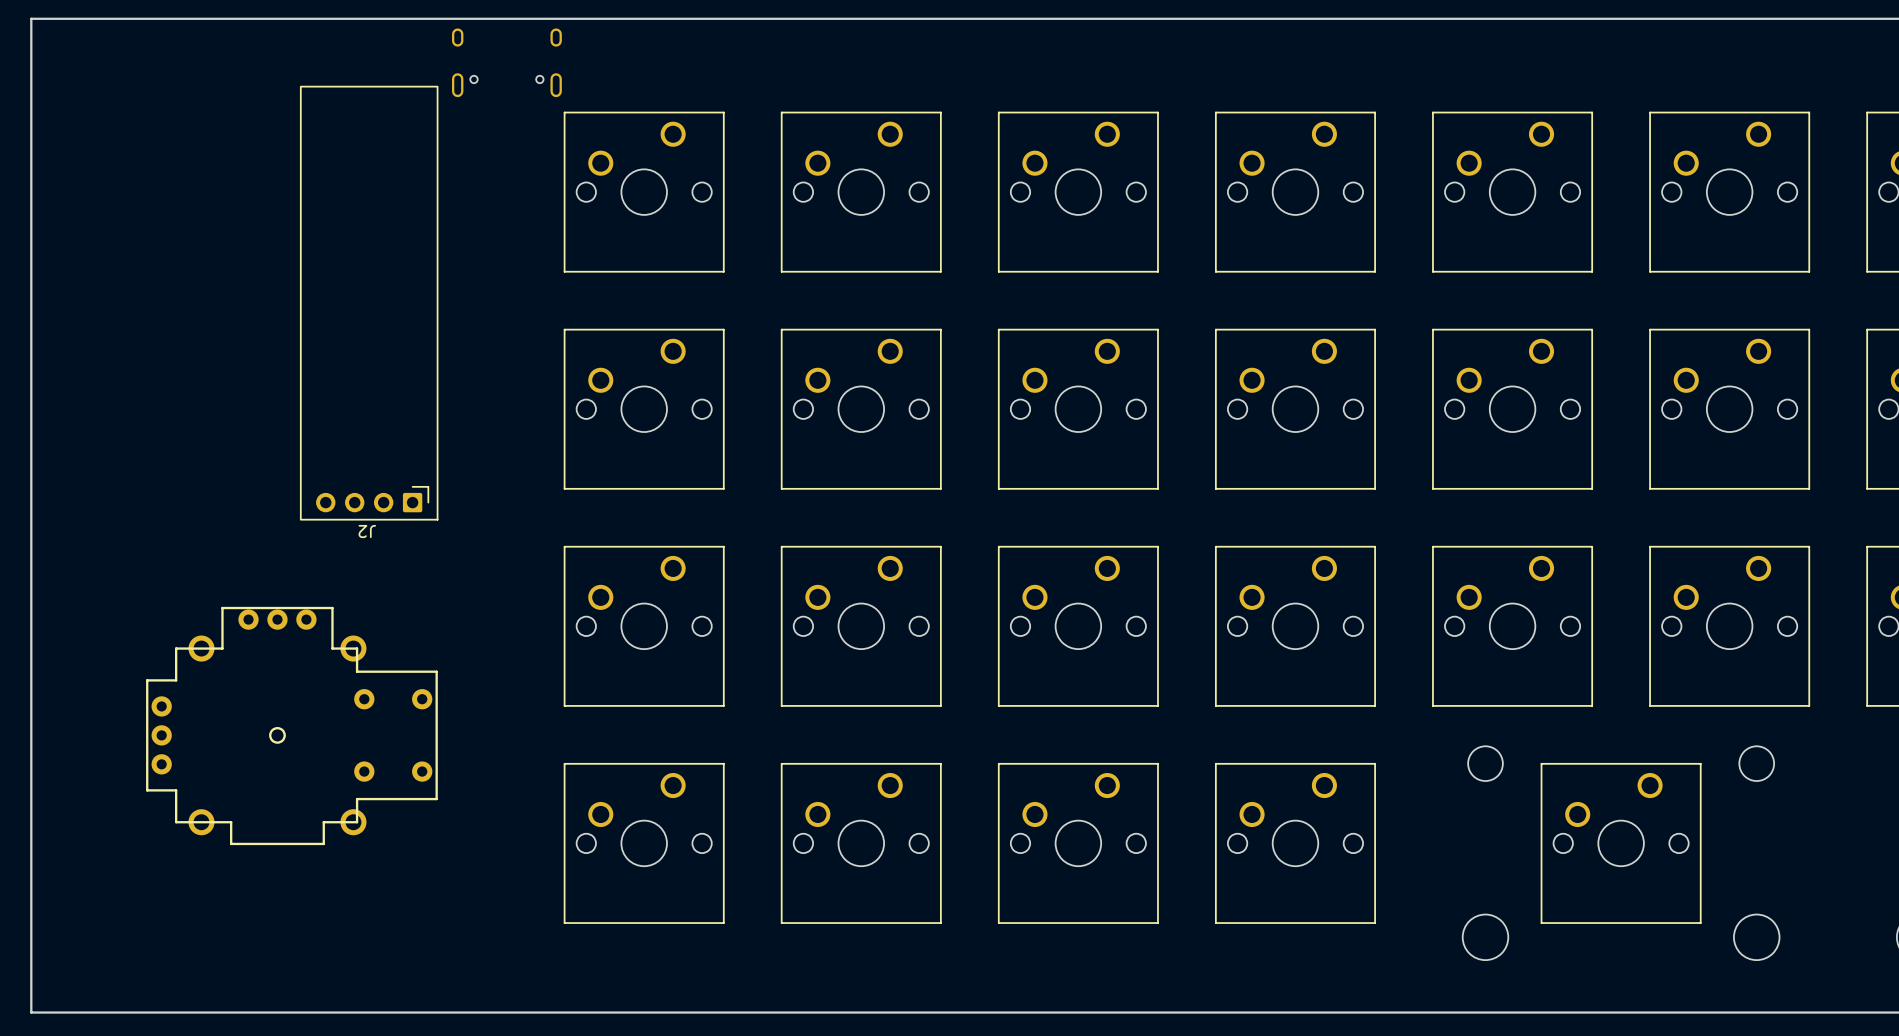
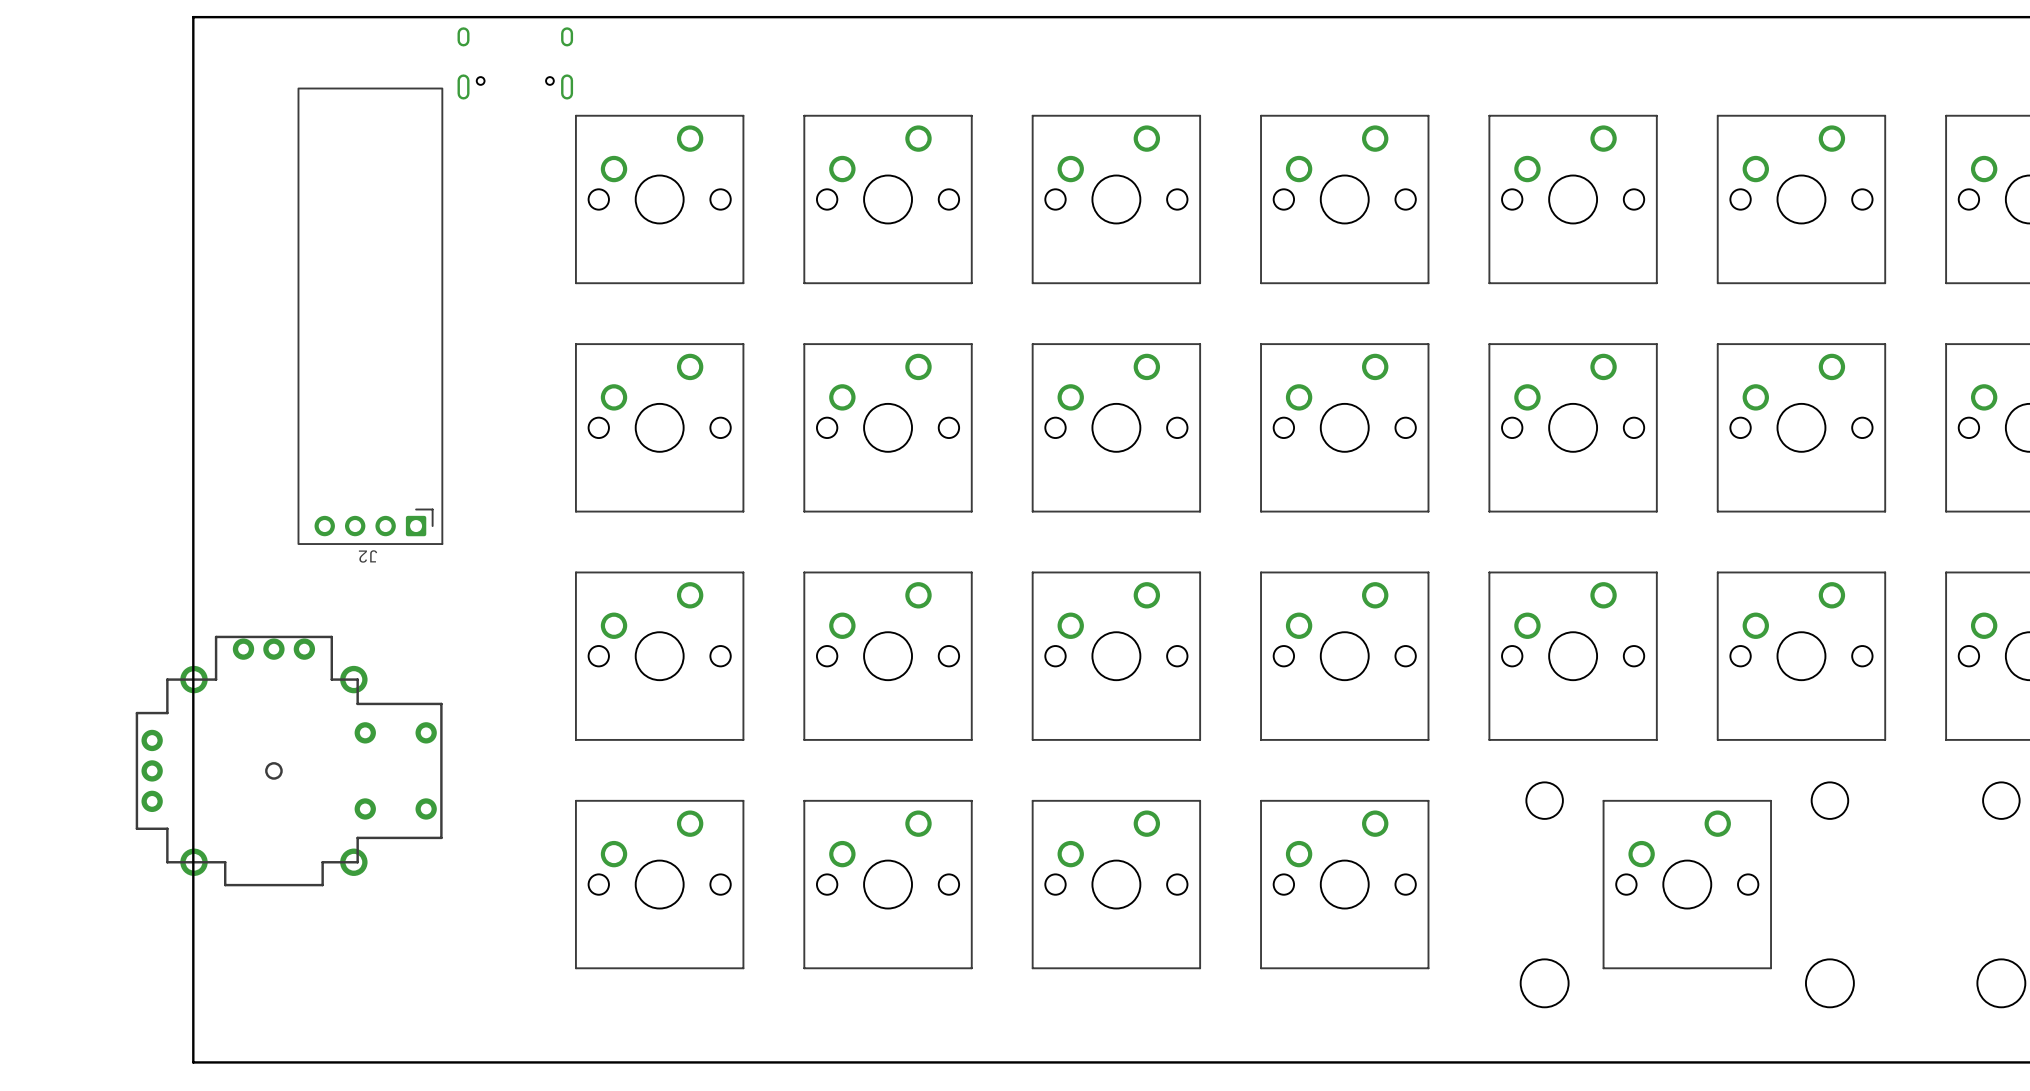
board edge: (200, 18) (31, 18) (31, 1012) (200, 1012) -> (193, 17) (193, 1062)

